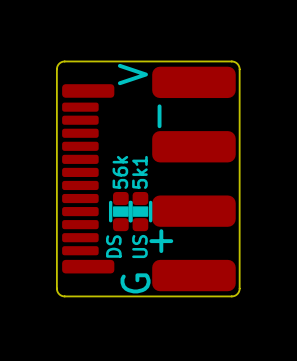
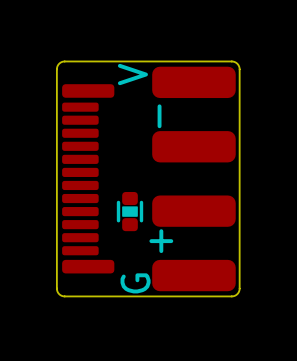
text: 56k (120, 172) -> none
text: 5k1 (139, 172) -> none
part: (120, 211) -> none
part: none -> (130, 211)
part: (140, 211) -> none
text: DS (113, 246) -> none
text: US (139, 246) -> none

